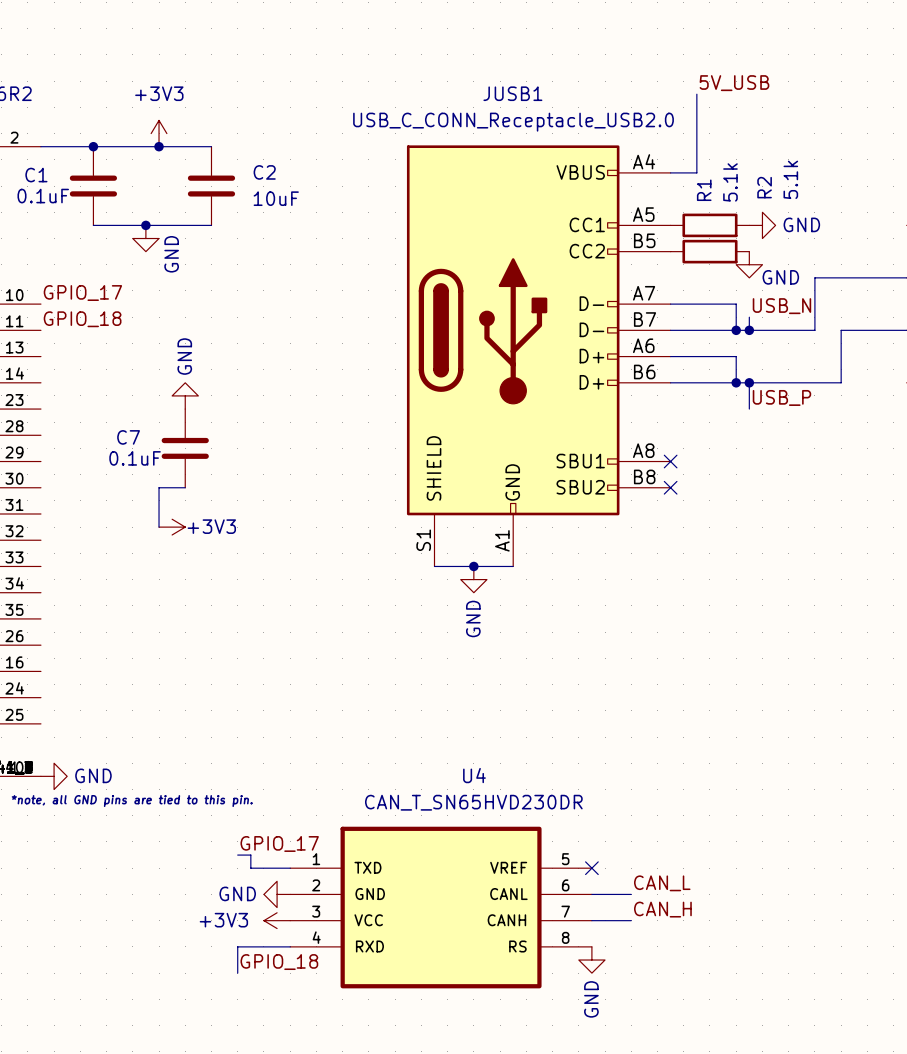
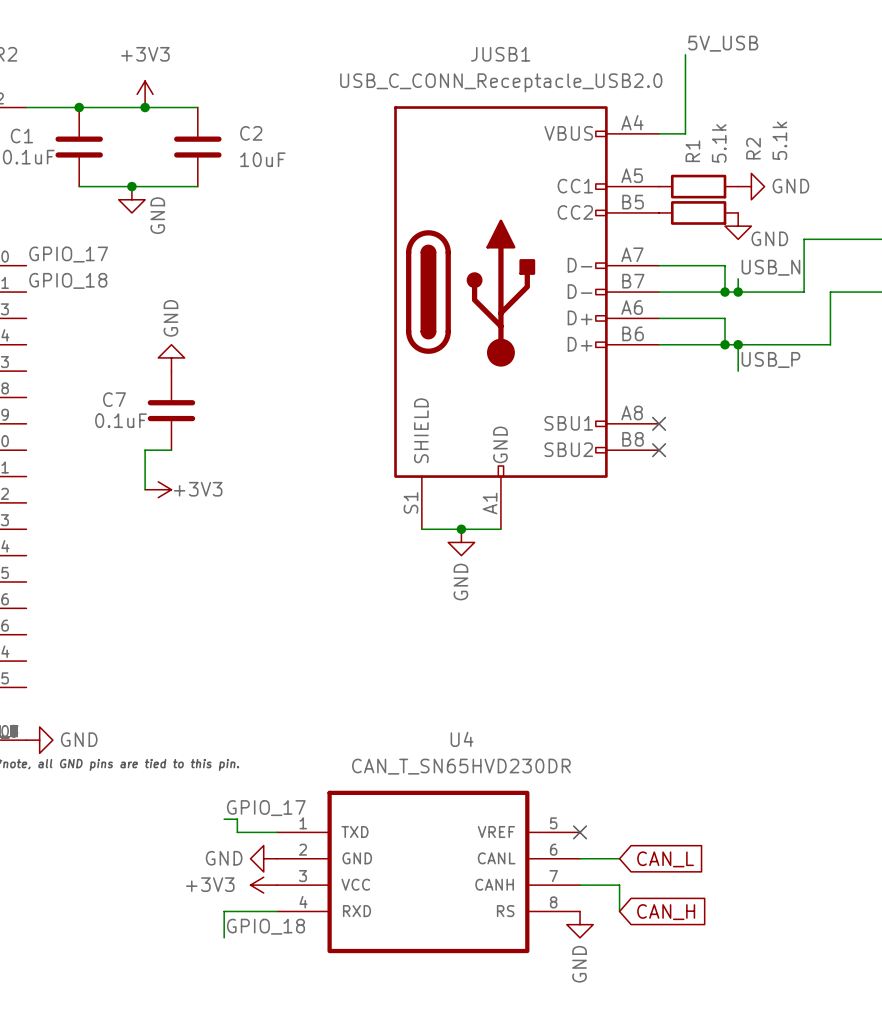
label: CAN_L (662, 883) -> none
global label: none -> CAN_L (665, 859)
label: CAN_H (662, 909) -> none
wire: none -> (619, 885) (619, 911)
global label: none -> CAN_H (666, 912)

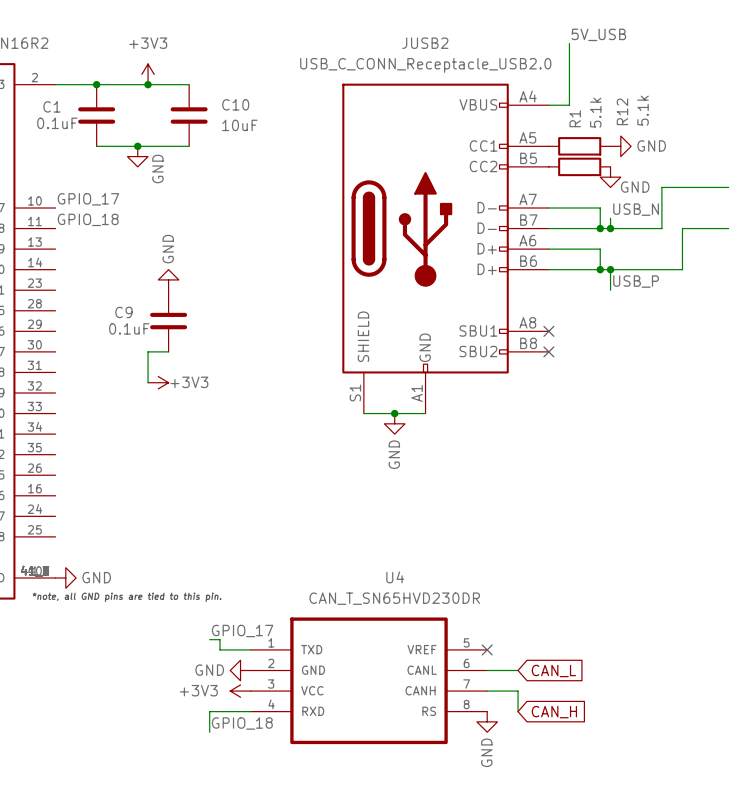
JUSB1 name: JUSB1 (500, 54) -> JUSB2 (425, 43)
C2 name: C2 (251, 133) -> C10 (235, 104)
R2 name: R2 (753, 148) -> R12 (622, 111)
C7 name: C7 (114, 399) -> C9 (123, 312)

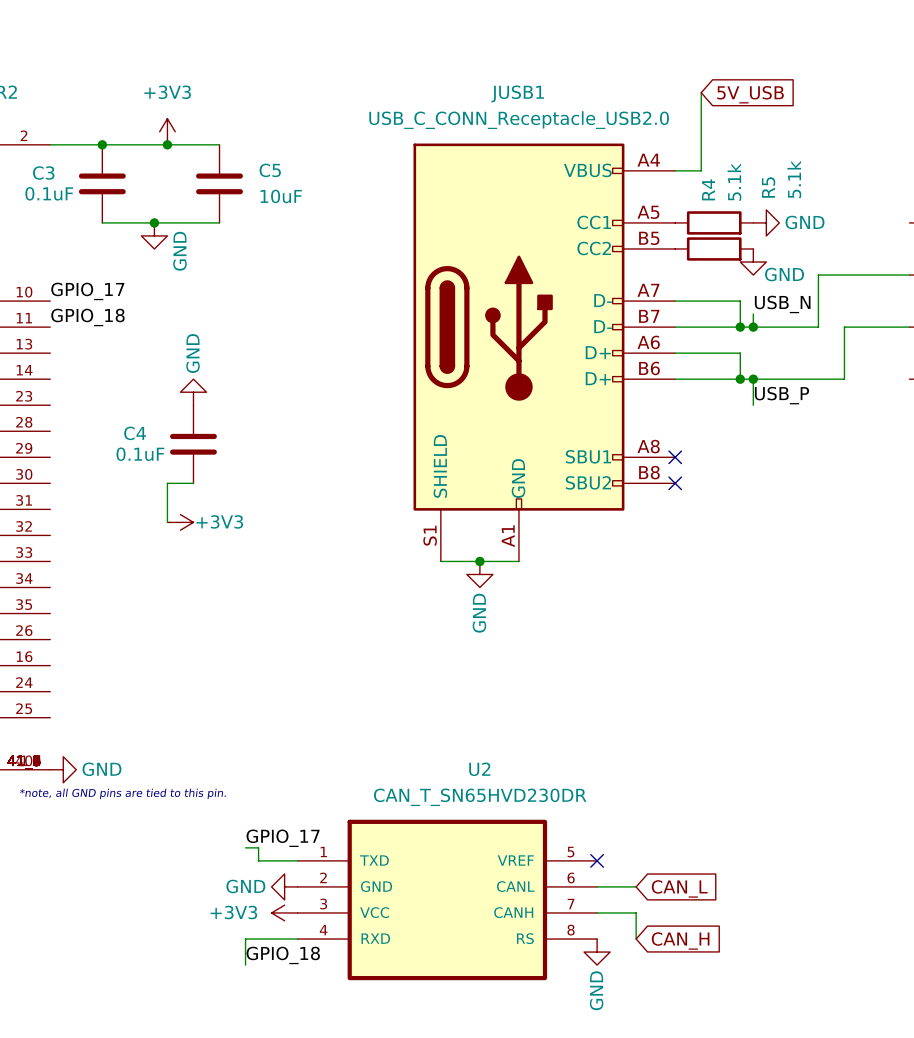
label: 5V_USB (598, 34) -> none
JUSB2 name: JUSB2 (425, 43) -> JUSB1 (517, 93)
global label: none -> 5V_USB (750, 94)
C10 name: C10 (235, 104) -> C5 (270, 170)
C1 name: C1 (51, 106) -> C3 (43, 172)
R12 name: R12 (622, 111) -> R5 (768, 187)
R1 name: R1 (575, 118) -> R4 (708, 189)
C9 name: C9 (123, 312) -> C4 (135, 433)
U4 name: U4 (395, 577) -> U2 (479, 769)

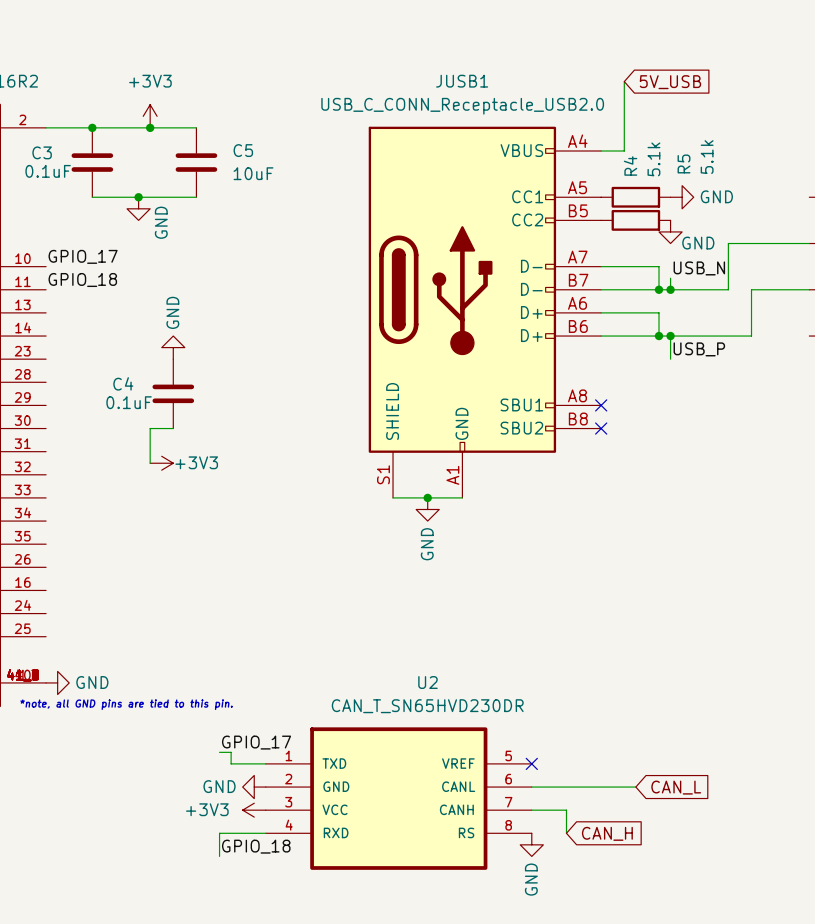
wire: none -> (566, 787) (635, 787)
global label position: CAN_L (679, 888) -> CAN_L (676, 787)

